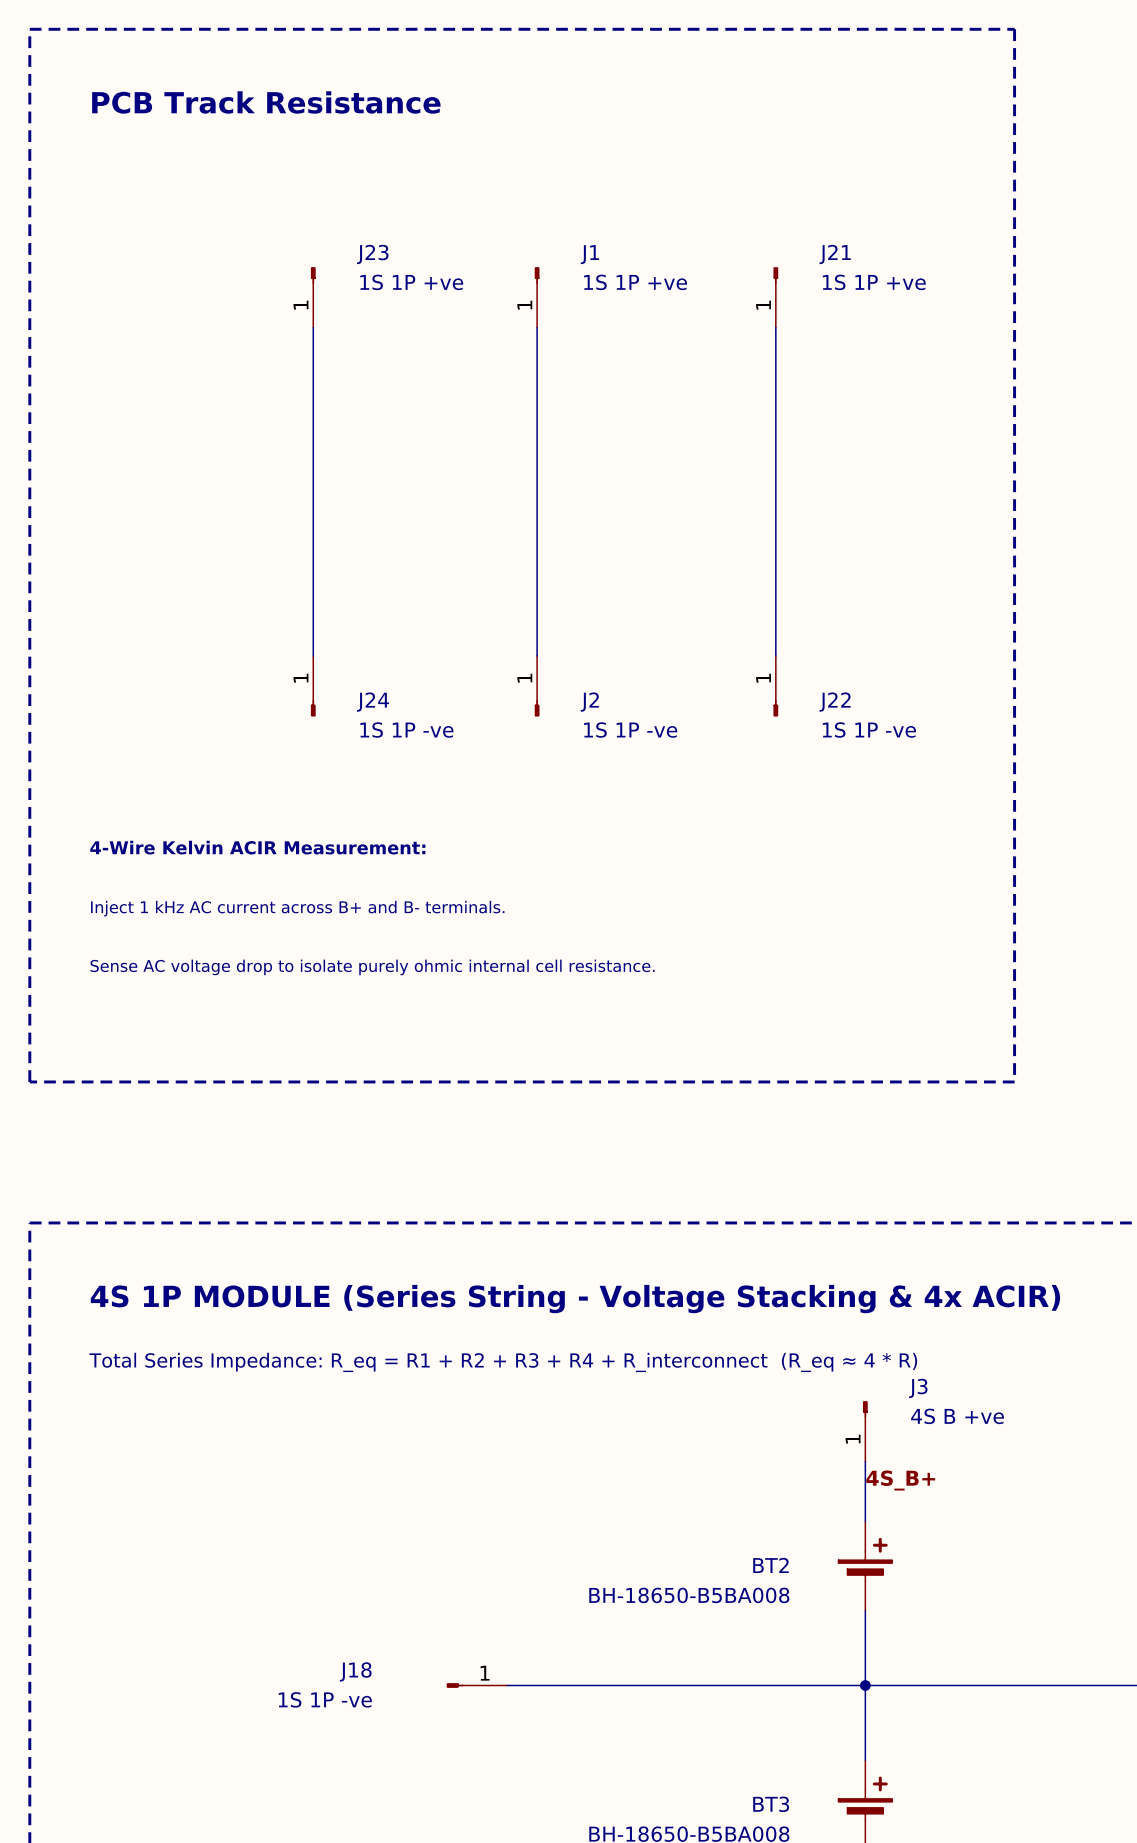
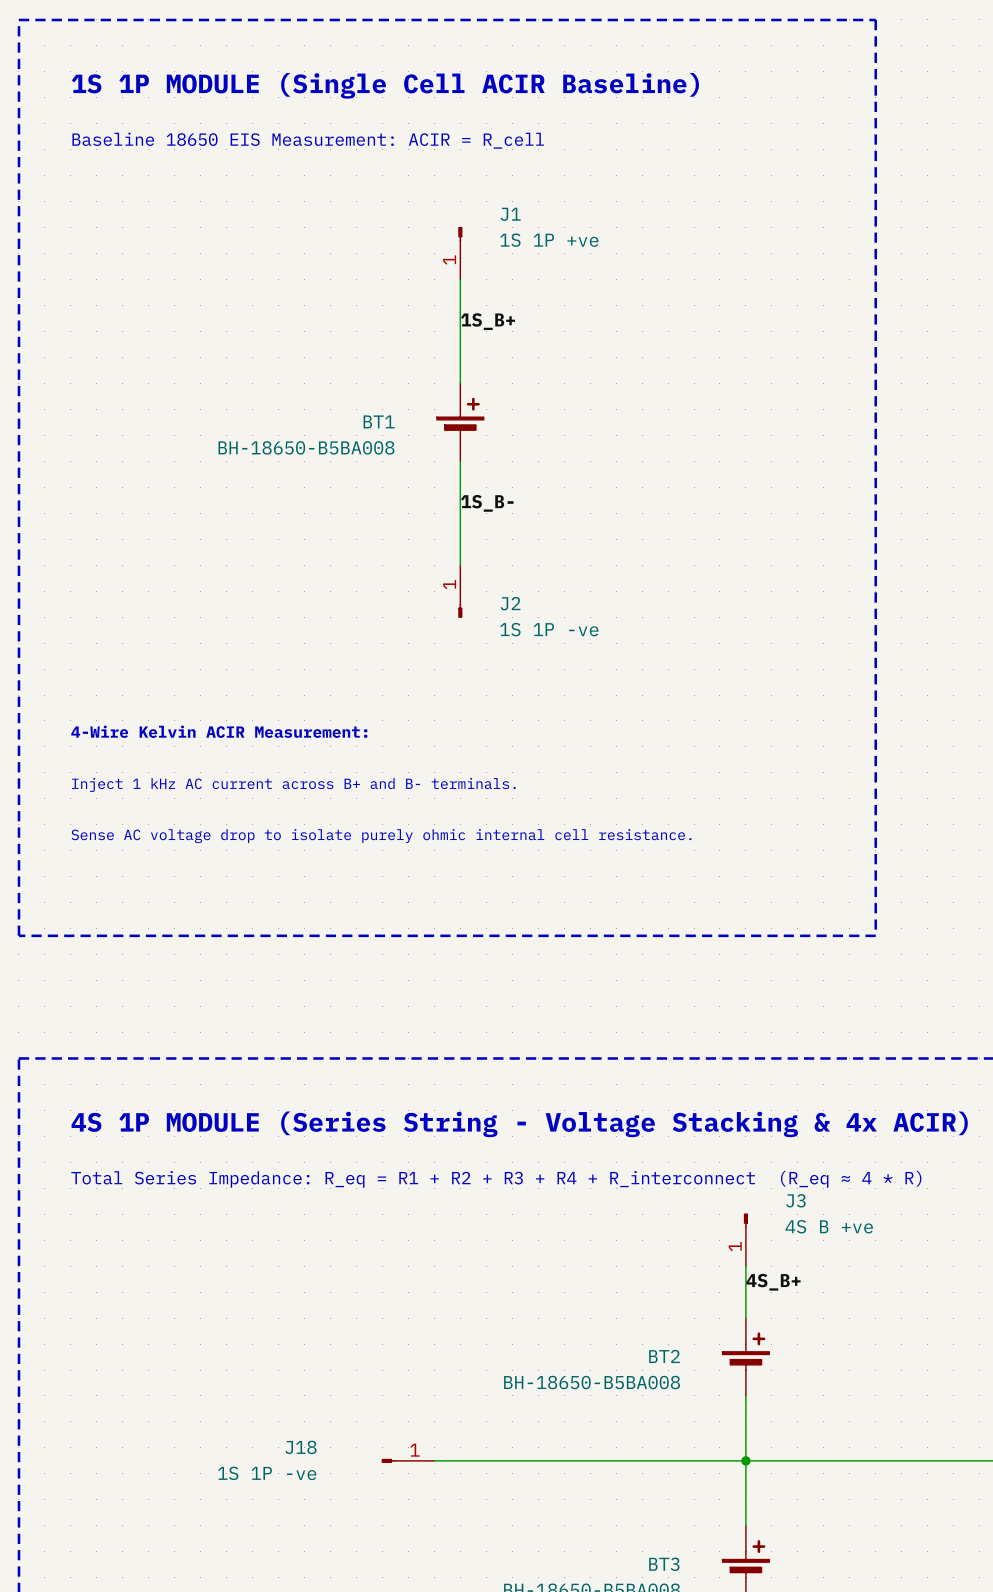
text: PCB Track Resistance (266, 102) -> 1S 1P MODULE (Single Cell ACIR Baseline) (385, 85)
text: none -> Baseline 18650 EIS Measurement: ACIR = R_cell (308, 140)
J23: 1S 1P +ve (313, 297) -> none
J21: 1S 1P +ve (775, 297) -> none
wire: (313, 327) (313, 655) -> none
wire: (775, 327) (775, 655) -> none
label: none -> 1S_B+ (487, 321)
BT1: none -> BH-18650-B5BA008 (460, 422)
label: none -> 1S_B- (487, 503)
J24: 1S 1P -ve (313, 686) -> none
J22: 1S 1P -ve (775, 686) -> none

